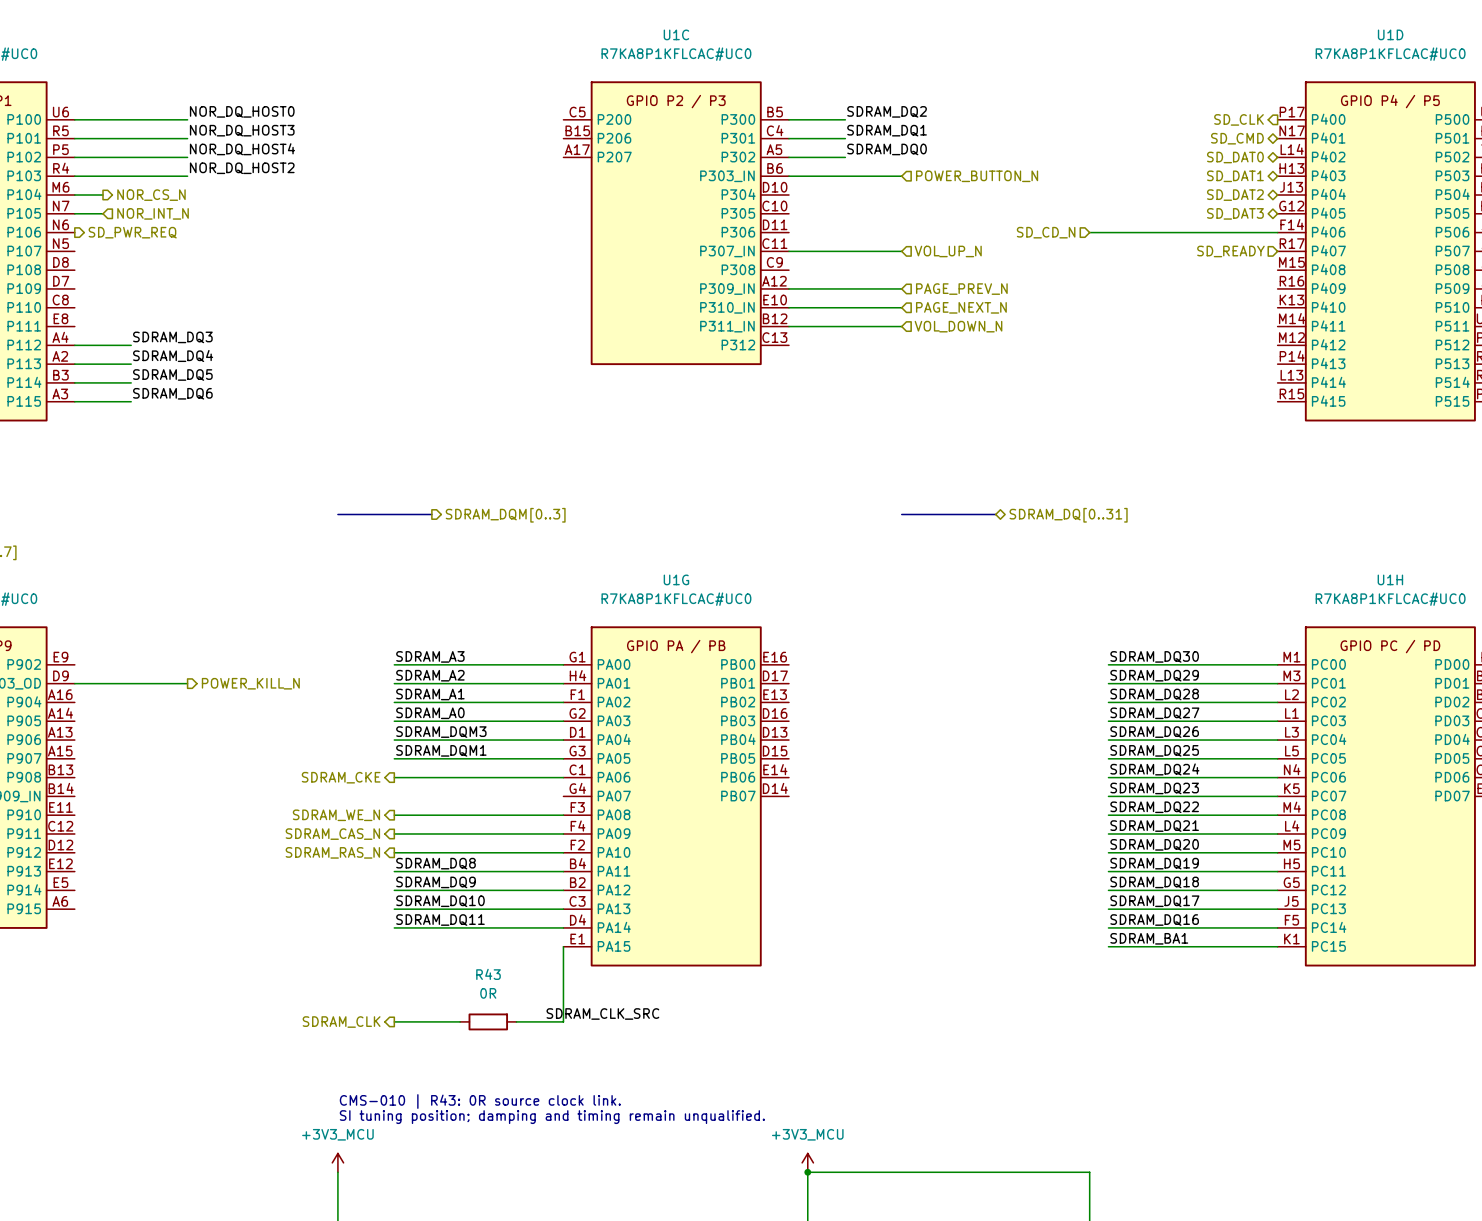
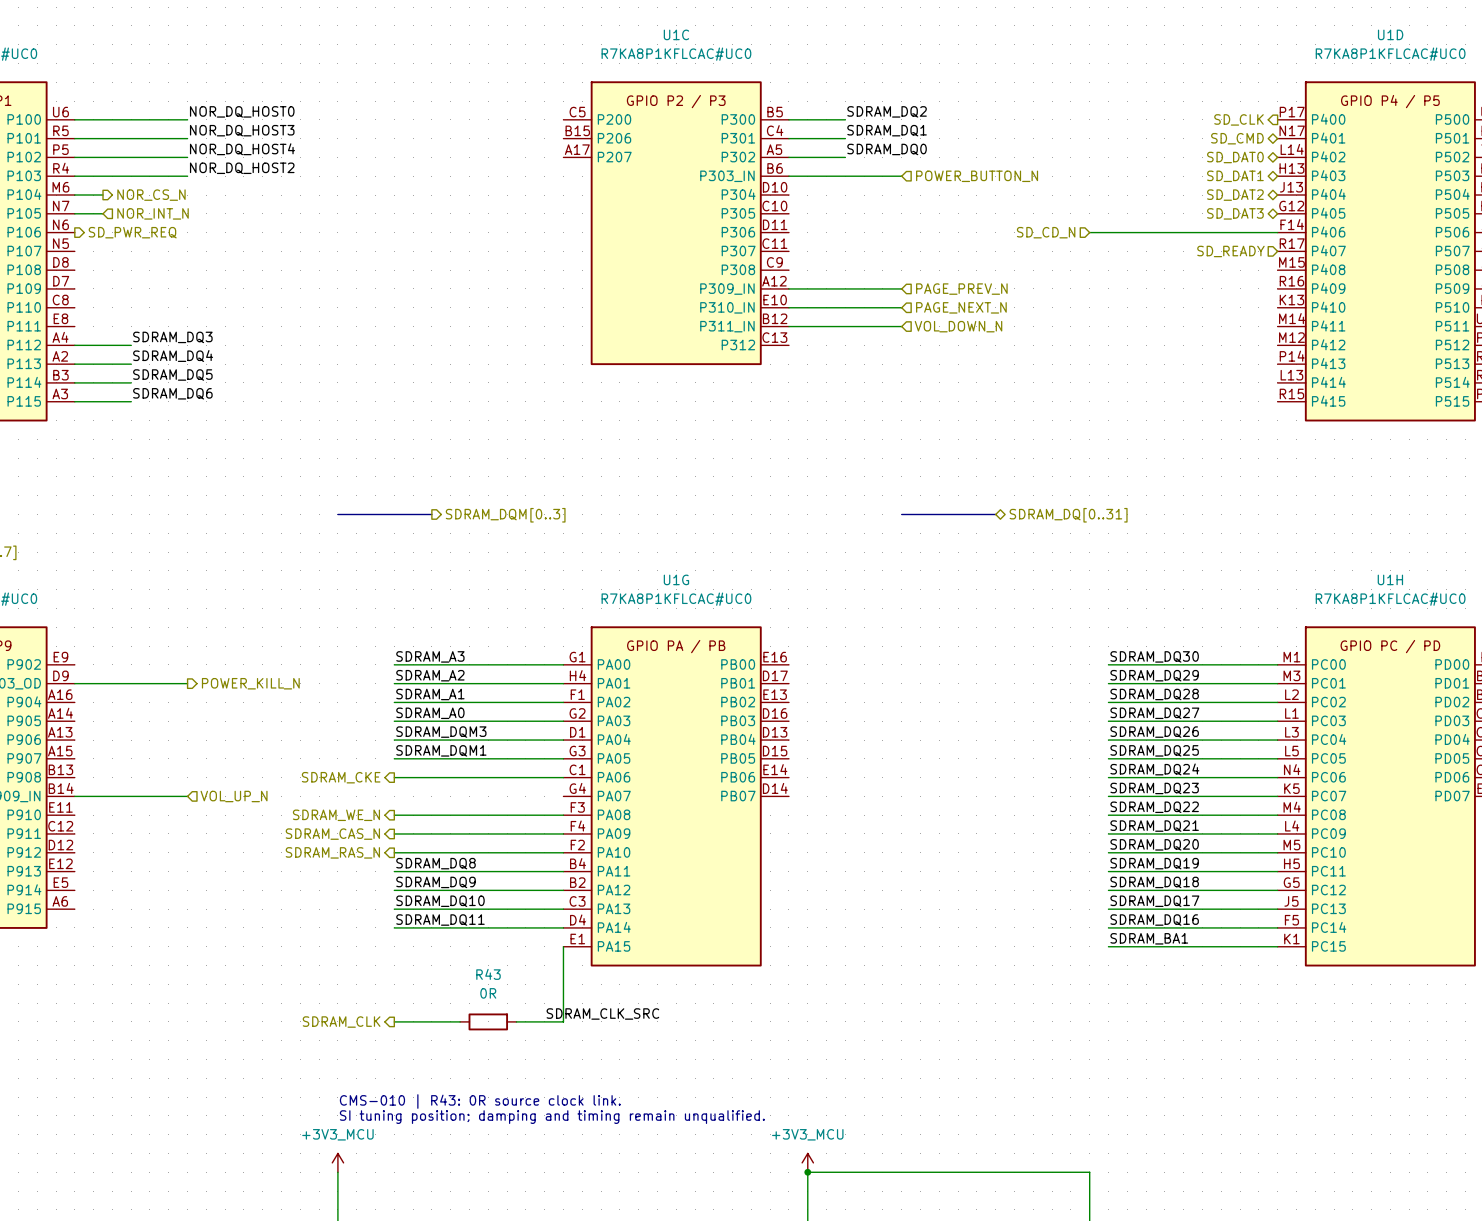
U1C pin name: P307_IN (727, 251) -> P307 (738, 251)
wire: (788, 251) (901, 251) -> none
hierarchical label: VOL_UP_N (948, 251) -> none
wire: none -> (74, 796) (187, 796)
hierarchical label: none -> VOL_UP_N (234, 796)

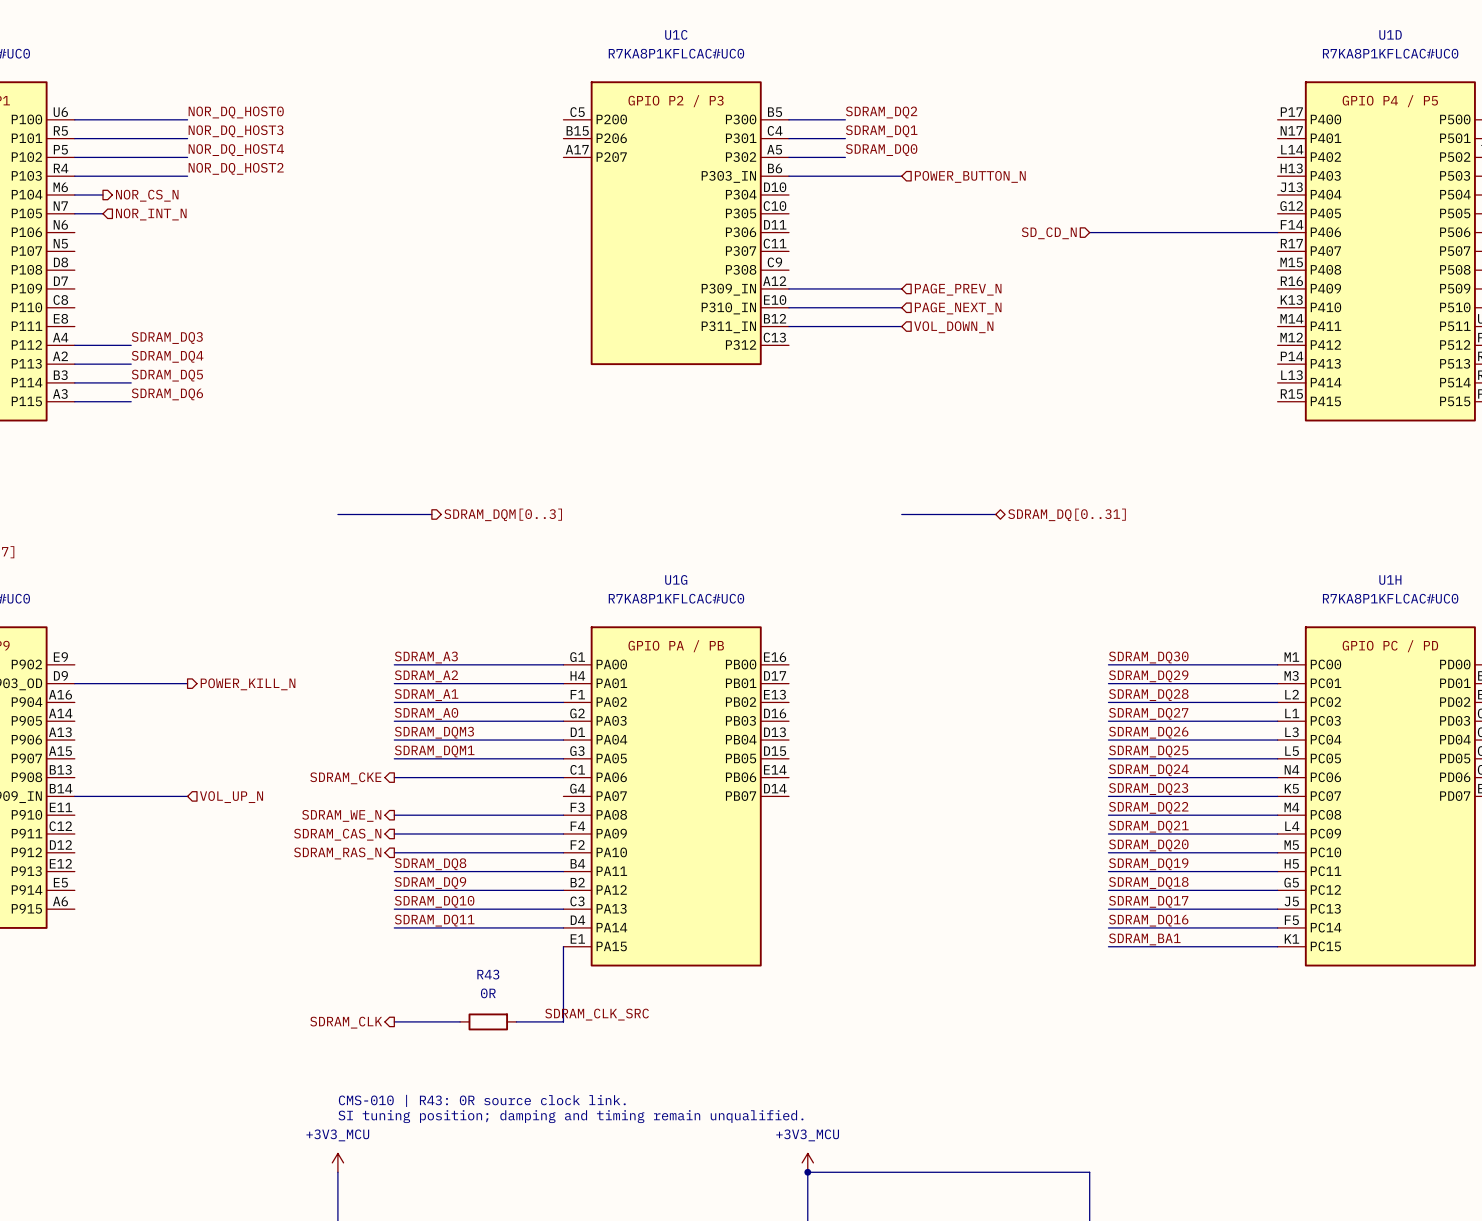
hierarchical label: SD_CLK (1238, 119) -> none
hierarchical label: SD_CMD (1237, 138) -> none
hierarchical label: SD_DAT0 (1235, 157) -> none
hierarchical label: SD_DAT1 (1235, 176) -> none
hierarchical label: SD_DAT2 (1235, 195) -> none
hierarchical label: SD_DAT3 (1235, 213) -> none
hierarchical label: SD_PWR_REQ (132, 232) -> none
hierarchical label: SD_READY (1230, 251) -> none

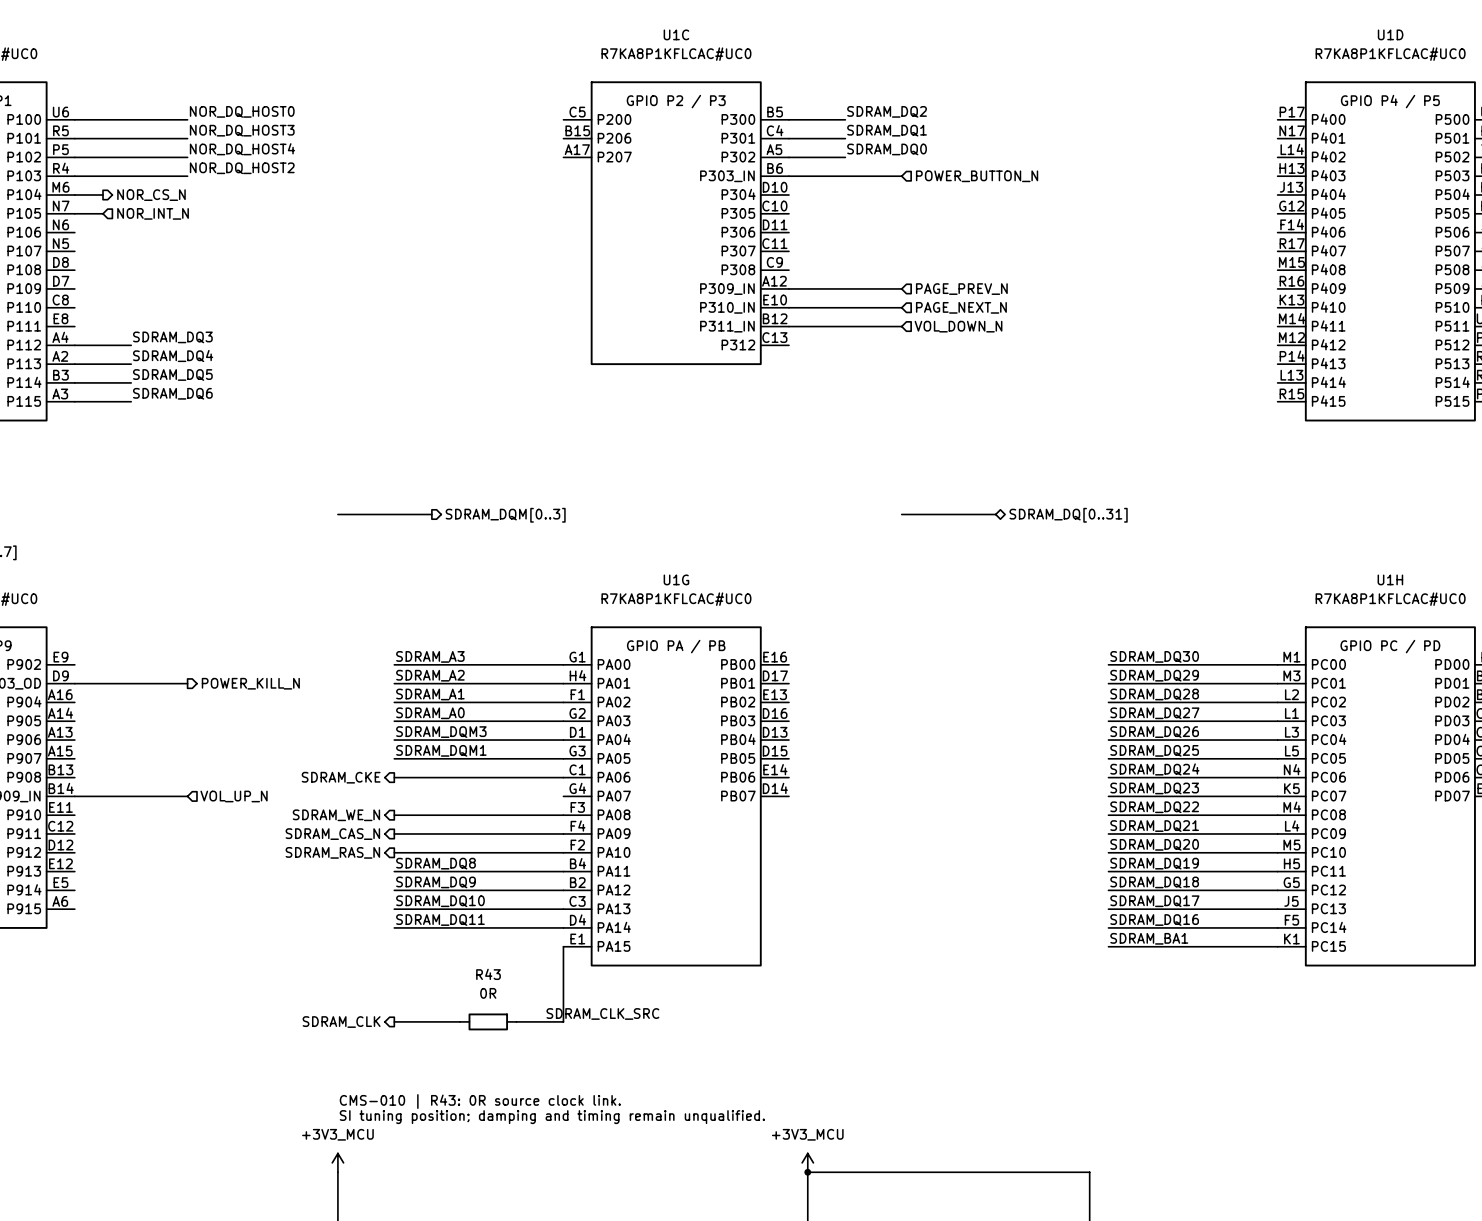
wire: (1089, 232) (1277, 232) -> none
hierarchical label: SD_CD_N (1049, 233) -> none

